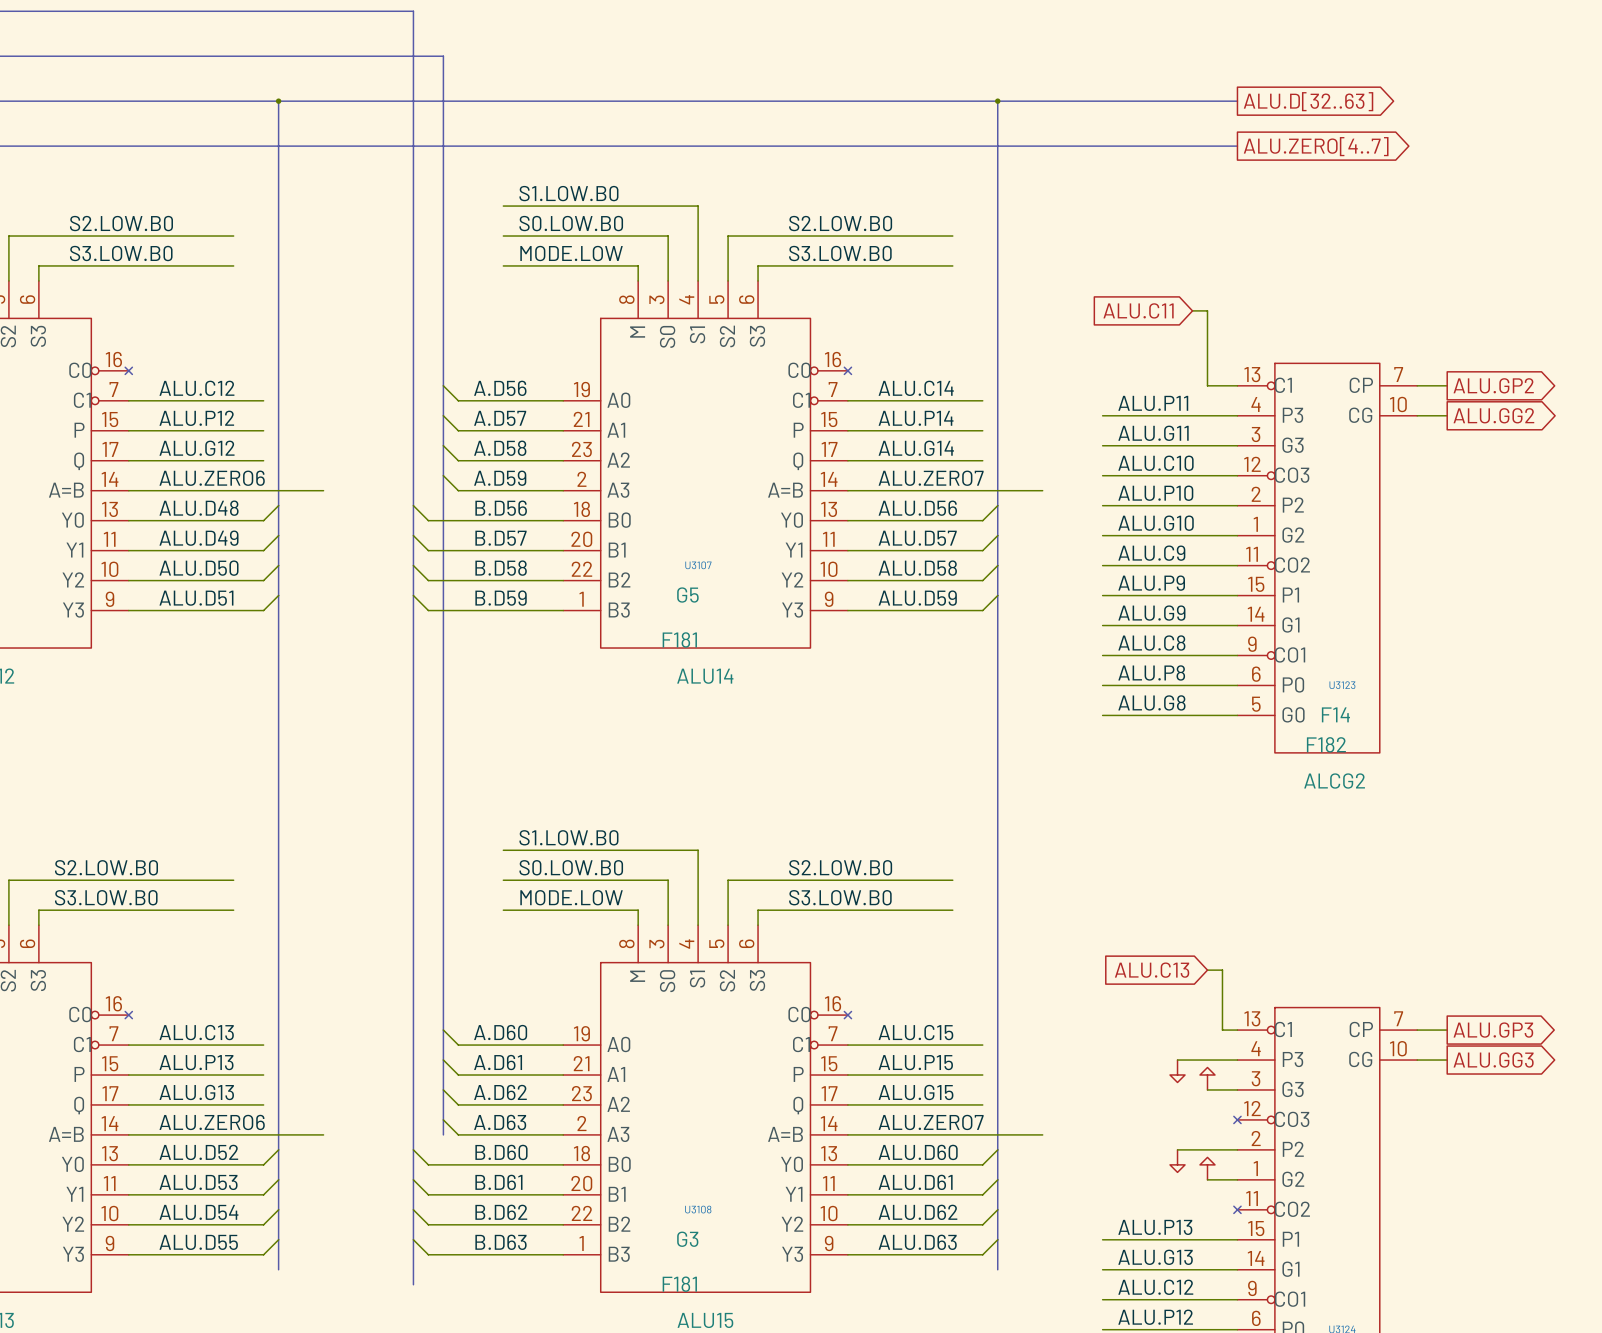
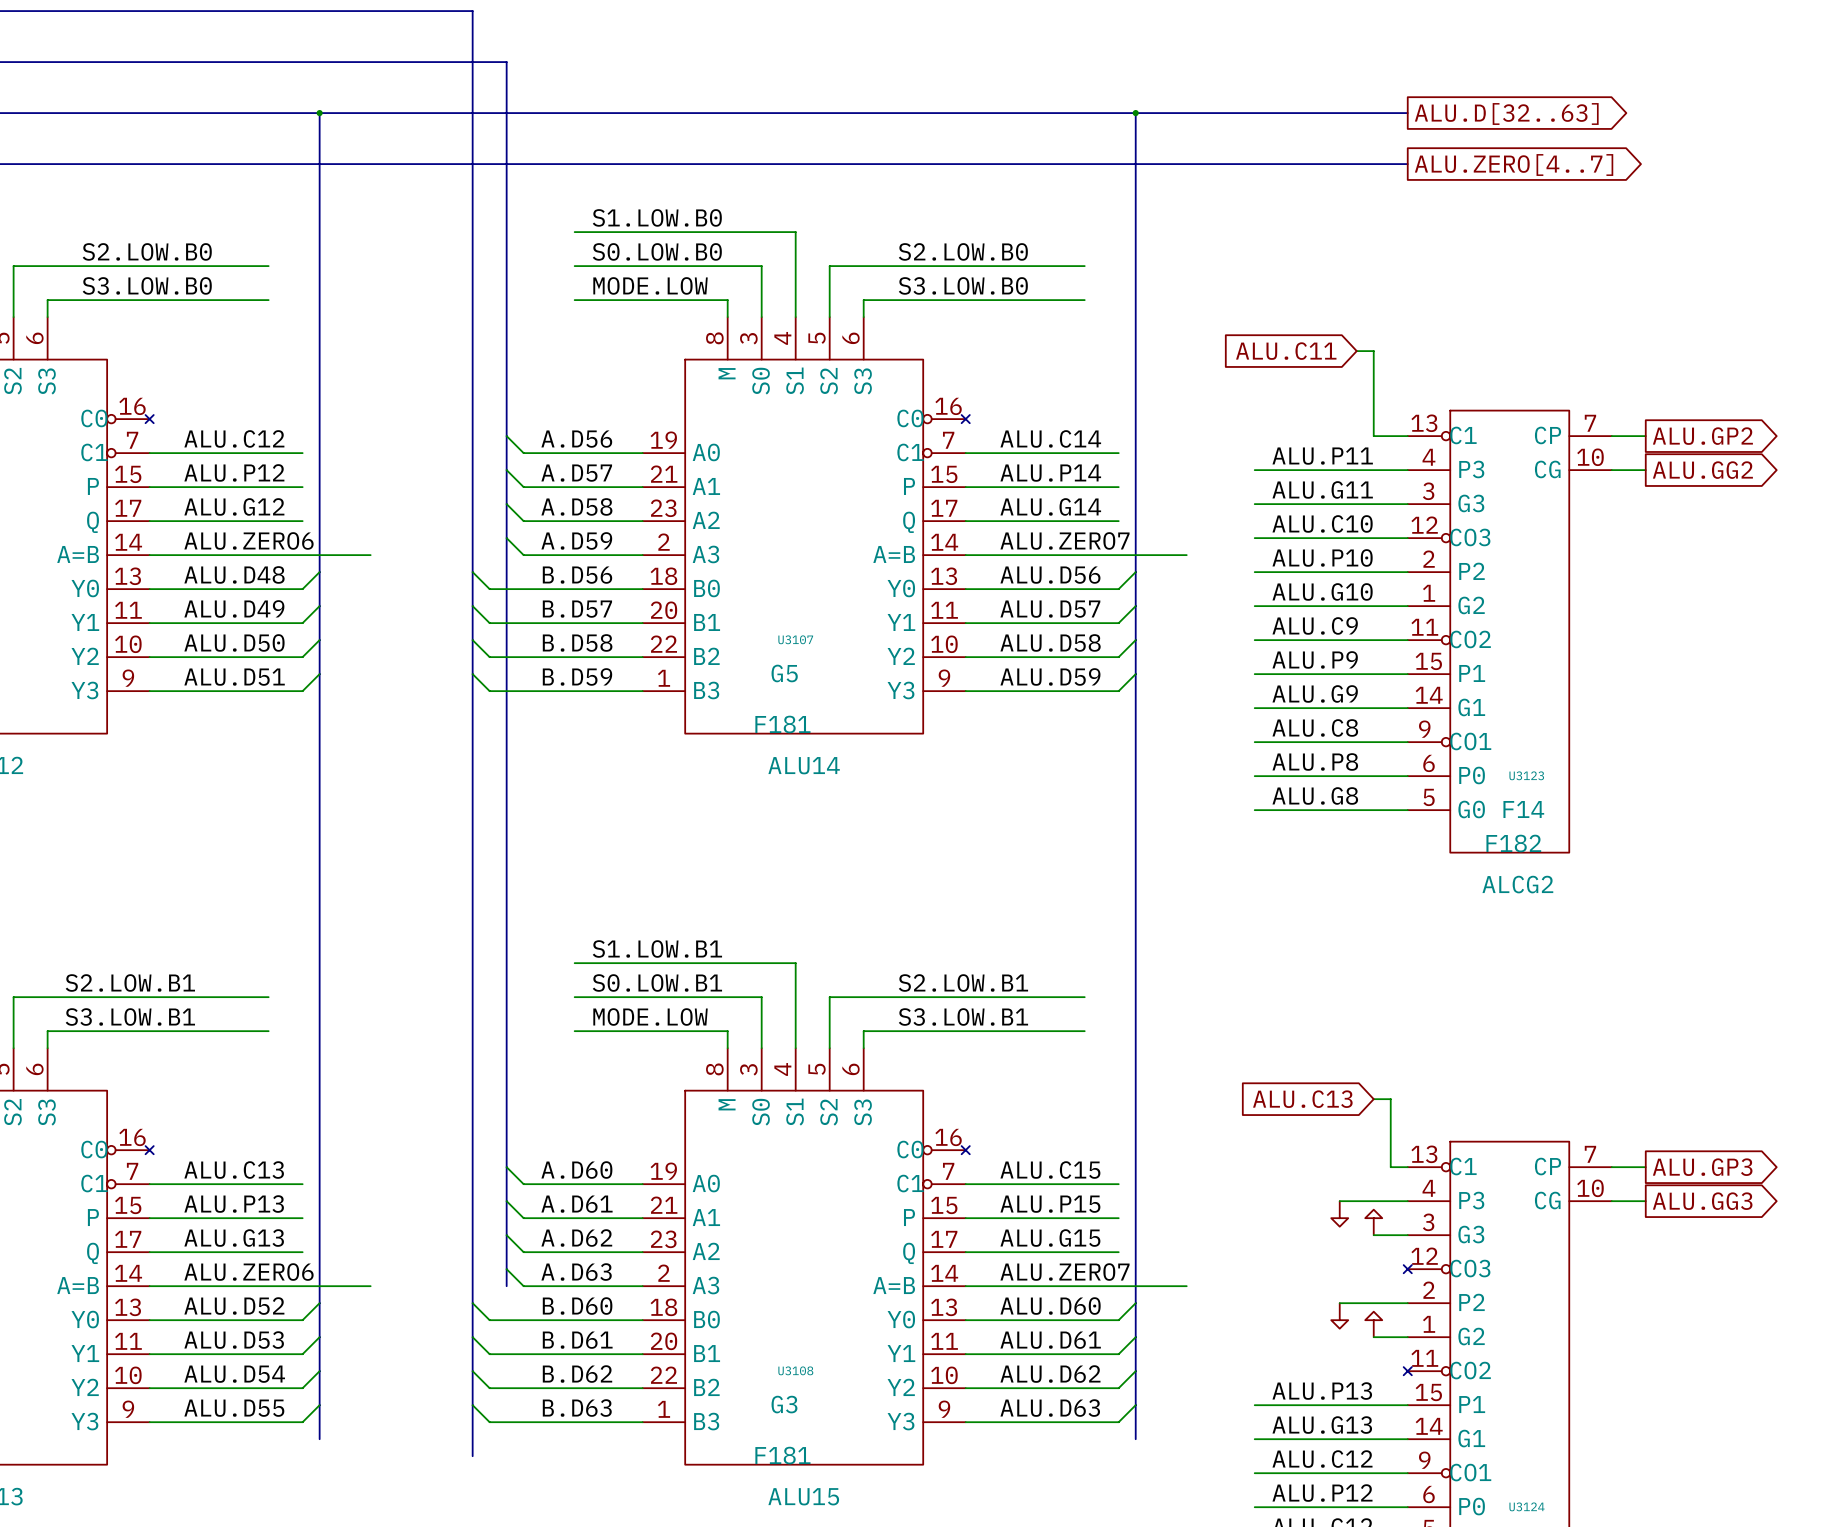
label: S1.LOW.B0 (568, 837) -> S1.LOW.B1 (657, 948)
label: S2.LOW.B0 (106, 867) -> S2.LOW.B1 (130, 983)
label: S0.LOW.B0 (571, 867) -> S0.LOW.B1 (657, 983)
label: S2.LOW.B0 (840, 867) -> S2.LOW.B1 (963, 983)
label: S3.LOW.B0 (106, 897) -> S3.LOW.B1 (130, 1017)
label: S3.LOW.B0 (840, 897) -> S3.LOW.B1 (963, 1017)

